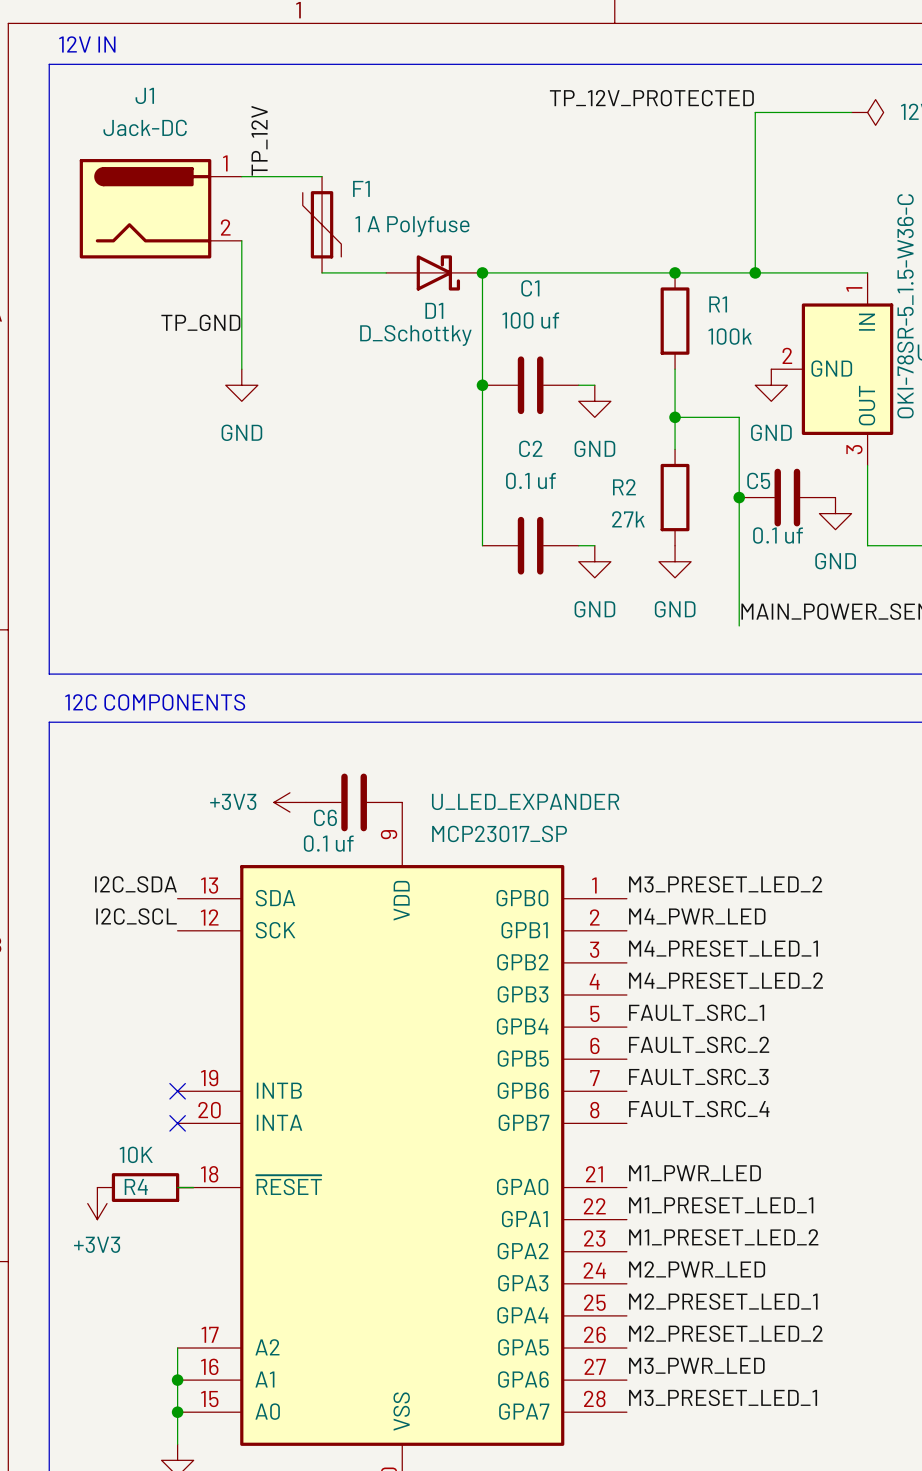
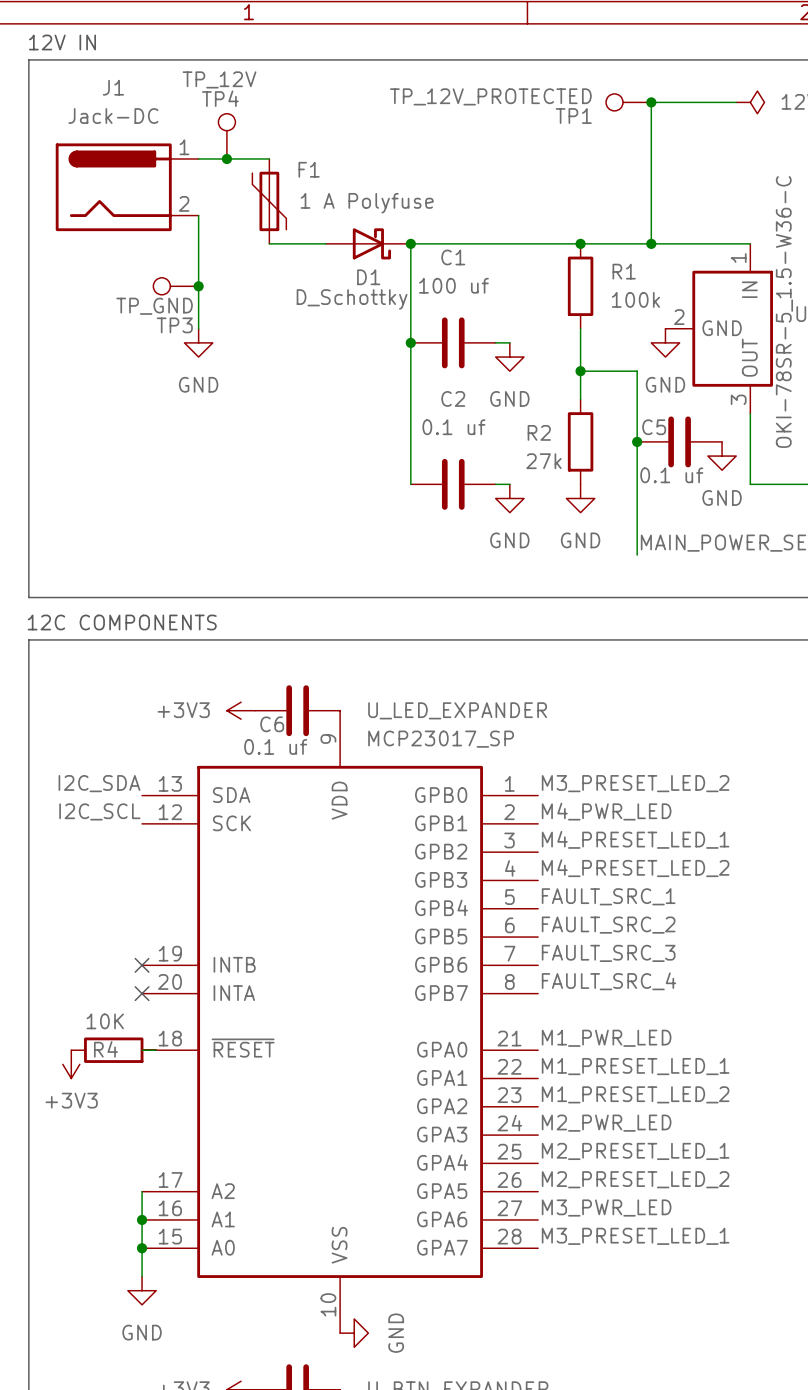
label: TP_12V_PROTECTED (651, 98) -> none
TP1: none -> TP_12V_PROTECTED (628, 102)
junction: none -> (651, 102)
label: TP_12V (259, 140) -> none
TP4: none -> TP_12V (226, 136)
junction: none -> (226, 158)
TP3: none -> TP_GND (175, 286)
junction: none -> (198, 286)
label: TP_GND (200, 322) -> none

